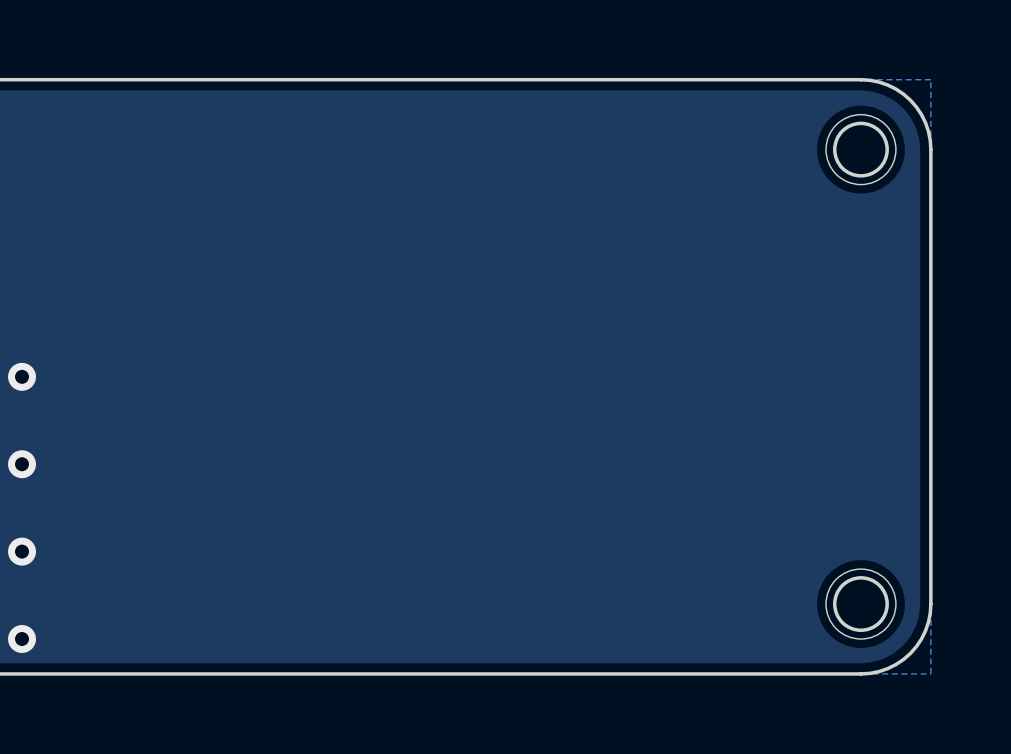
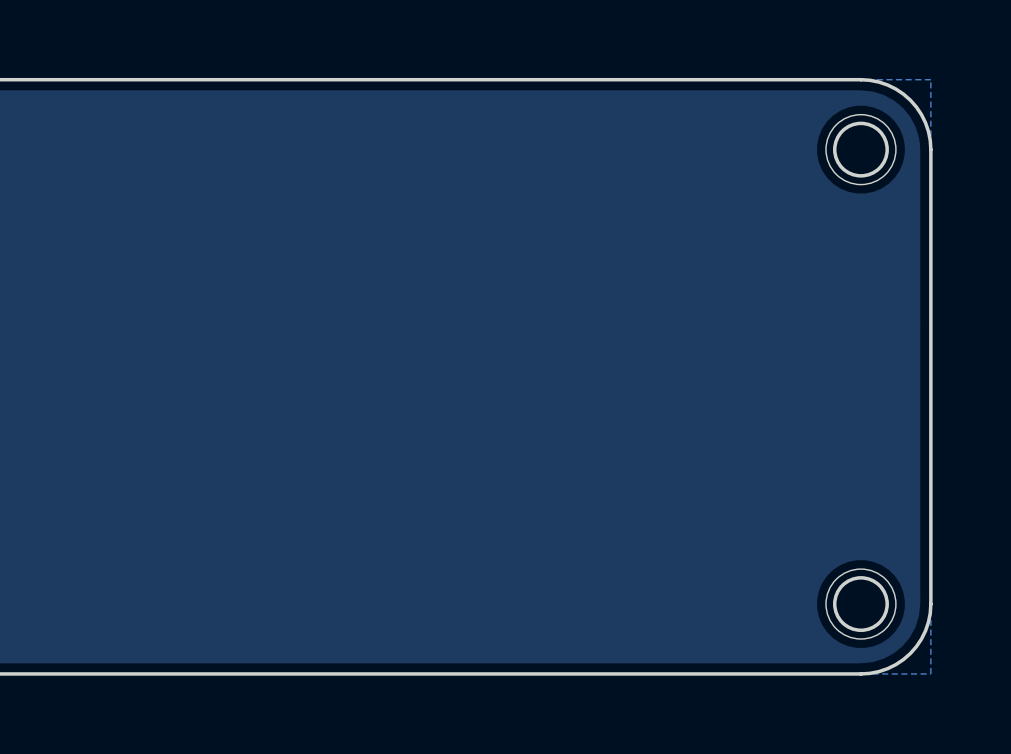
via: (22, 376) -> none
via: (22, 464) -> none
via: (22, 551) -> none
via: (22, 639) -> none

